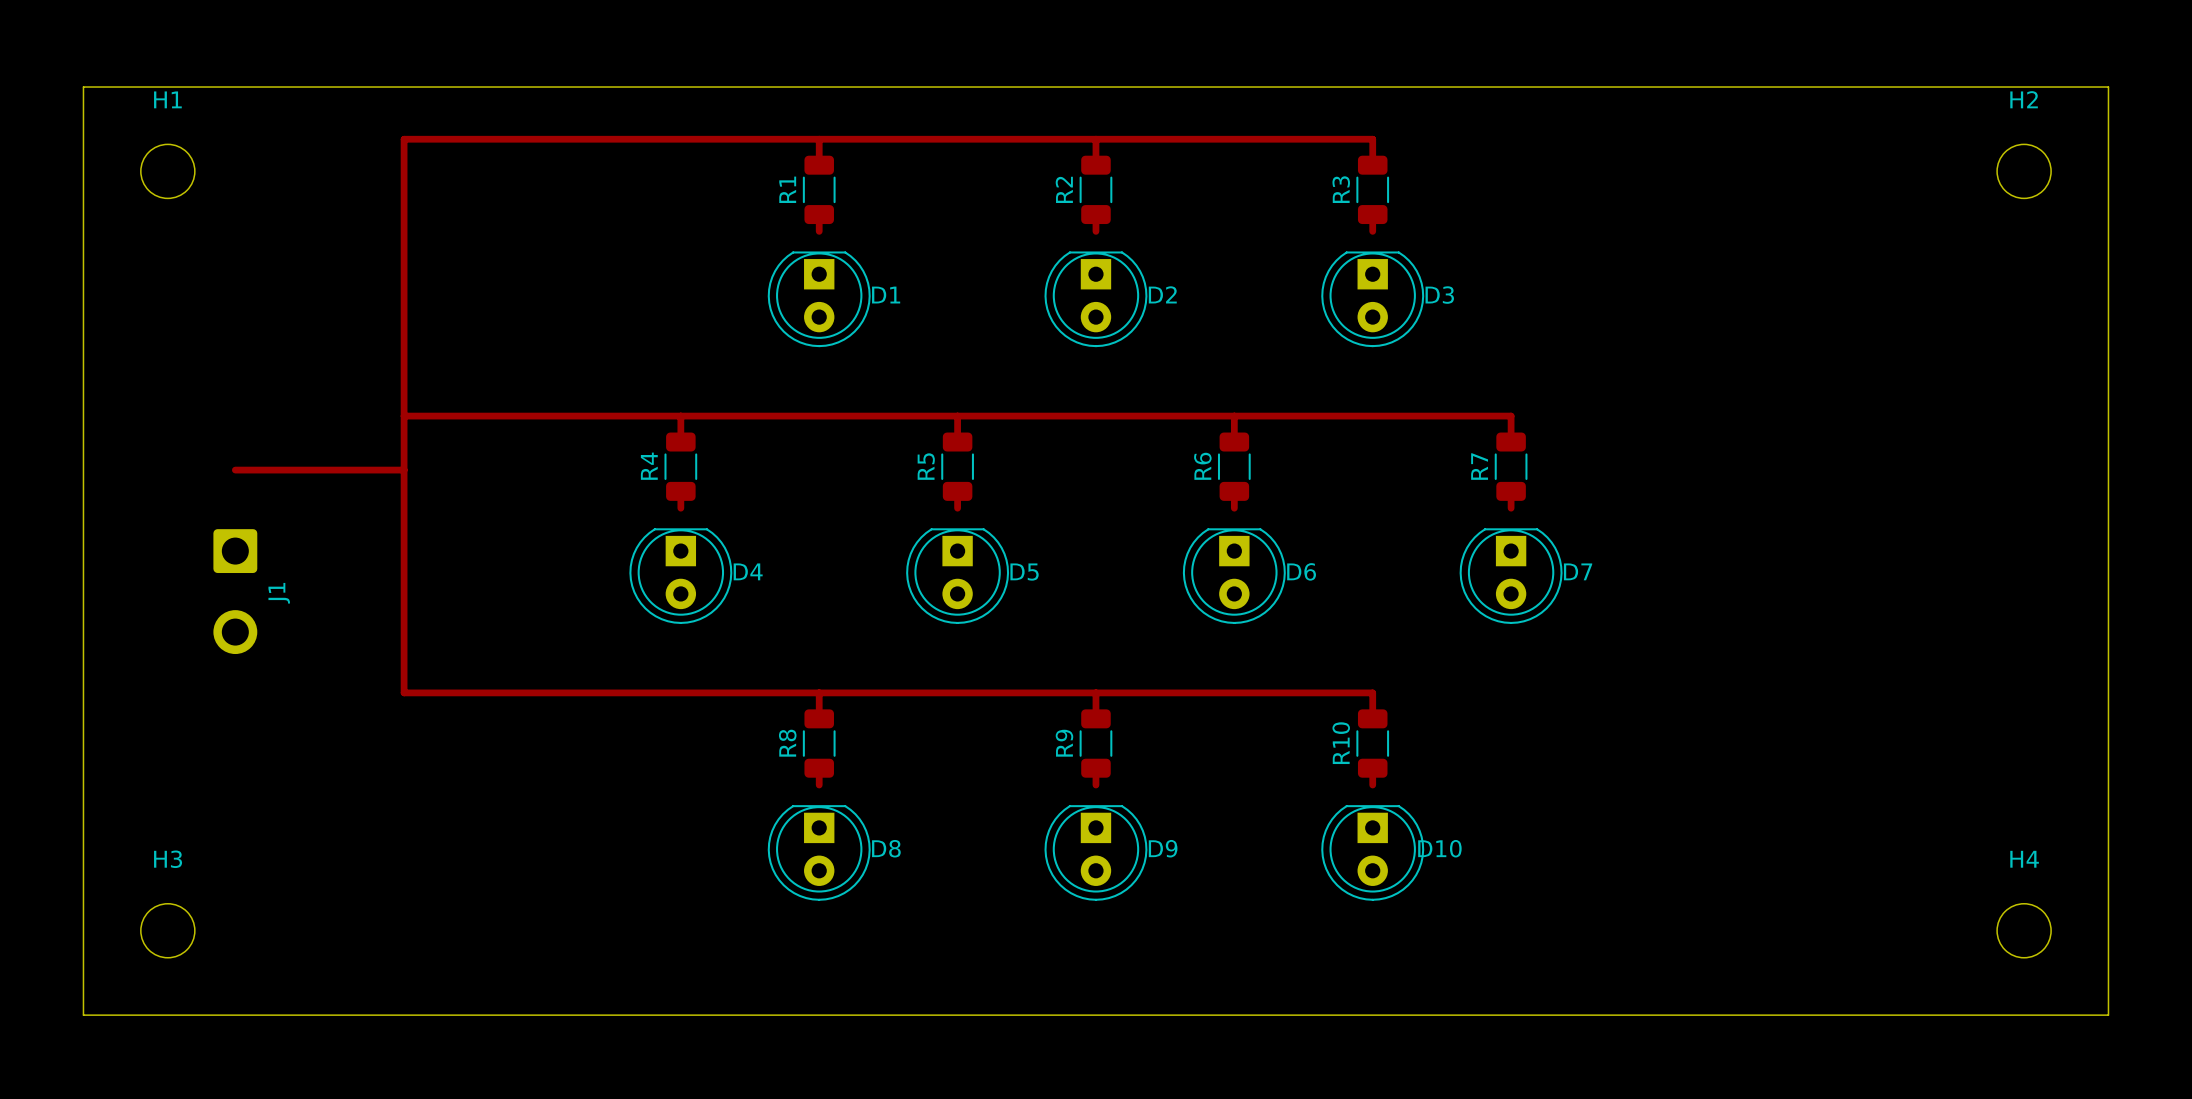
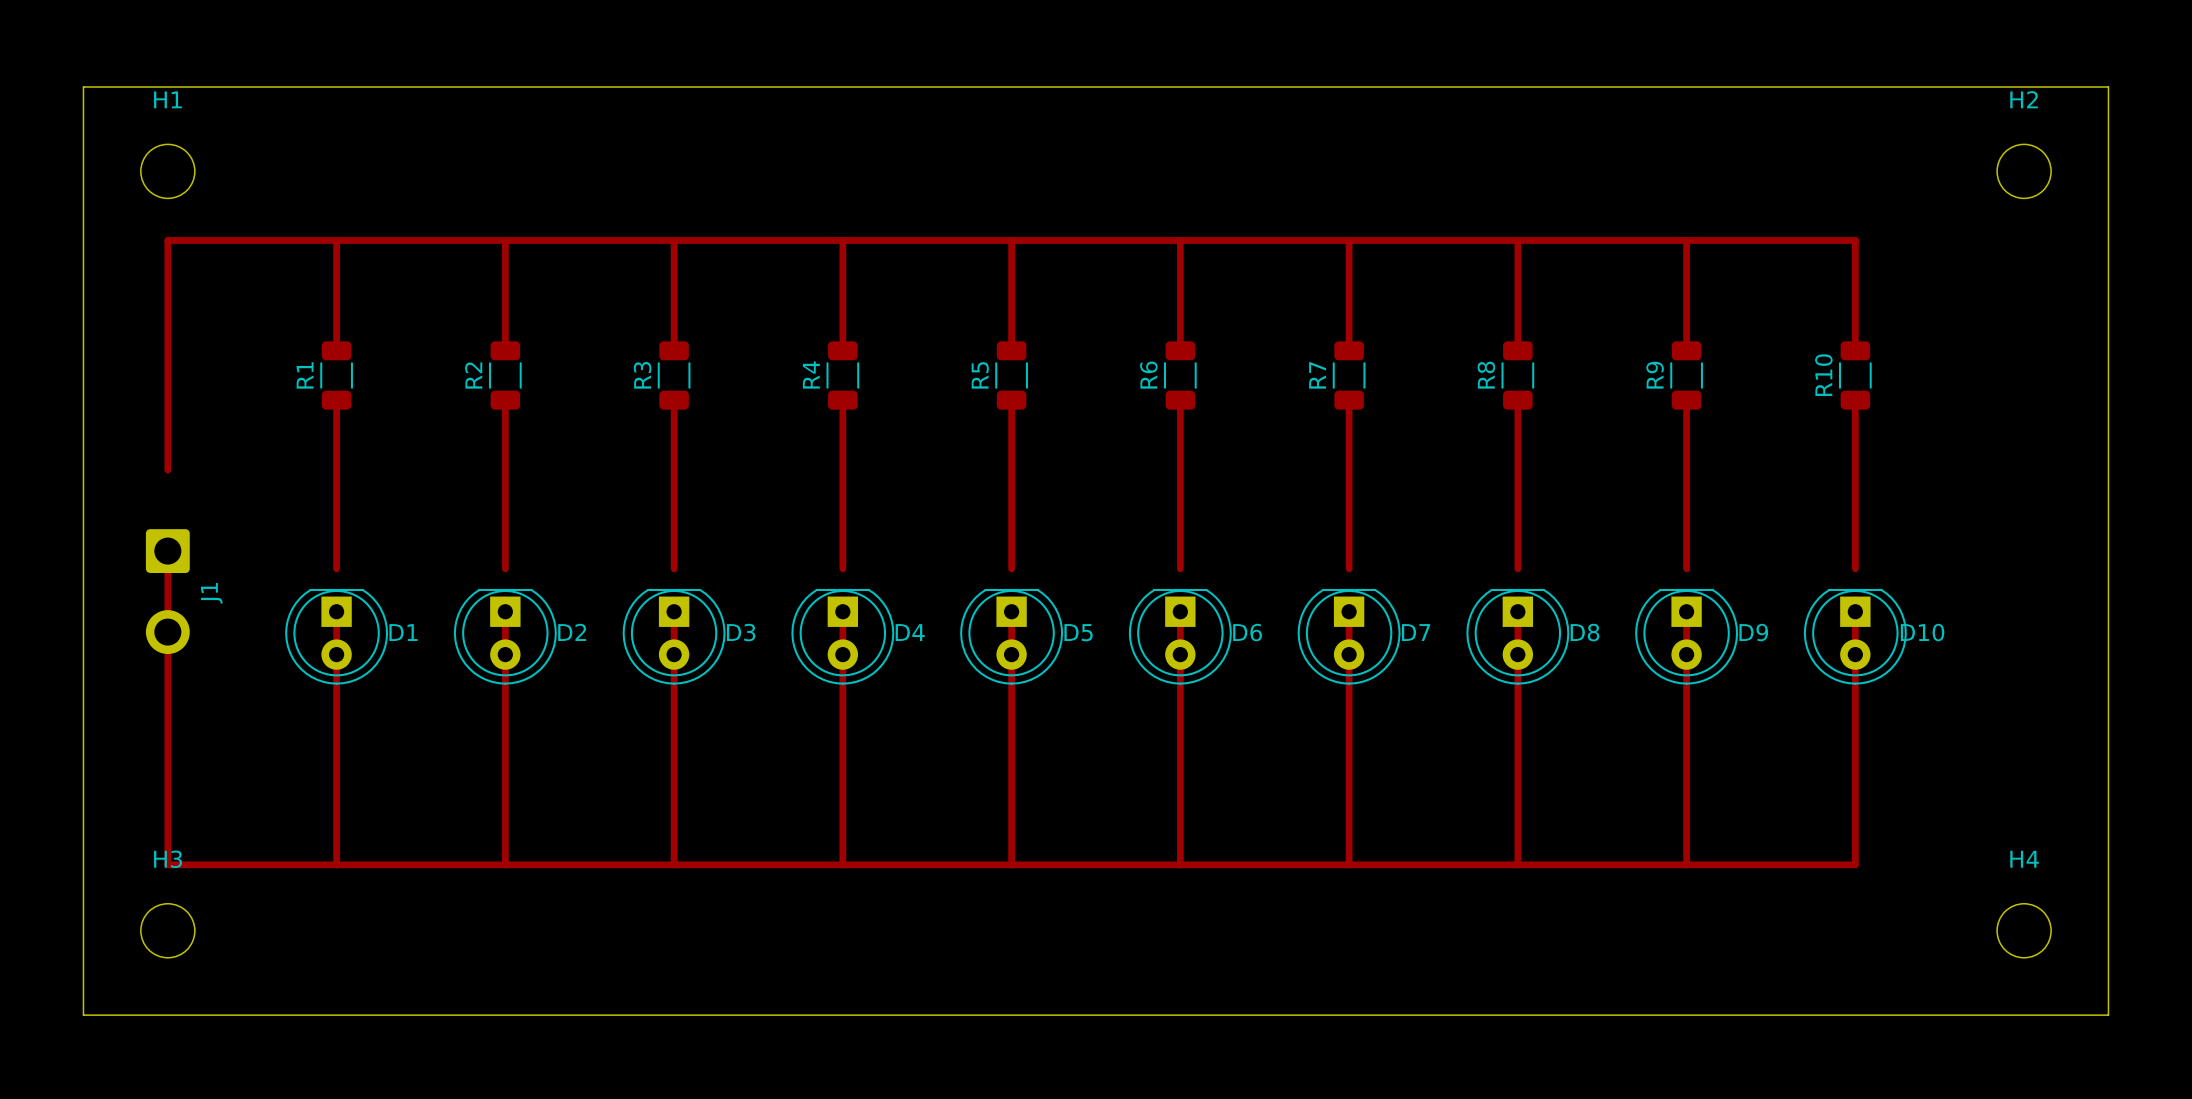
track: (819, 139) (819, 165) -> none
track: (1095, 139) (1095, 165) -> none
track: (1372, 165) (1372, 139) (404, 139) (404, 692) (1372, 692) (1372, 718) -> none
R1 position: (819, 189) -> (336, 375)
R2 position: (1095, 189) -> (505, 375)
R3 position: (1372, 189) -> (674, 375)
track: (819, 214) (819, 231) -> none
track: (1095, 214) (1095, 231) -> none
track: (1372, 214) (1372, 231) -> none
track: none -> (336, 240) (336, 350)
track: none -> (505, 240) (505, 350)
track: none -> (674, 240) (674, 350)
track: none -> (842, 240) (842, 350)
track: none -> (1011, 240) (1011, 350)
track: none -> (1180, 240) (1180, 350)
track: none -> (1349, 240) (1349, 350)
track: none -> (1517, 240) (1517, 350)
track: none -> (1686, 240) (1686, 350)
D1 position: (819, 299) -> (336, 636)
D2 position: (1095, 299) -> (505, 636)
D3 position: (1372, 299) -> (674, 636)
track: none -> (1855, 350) (1855, 240) (167, 240) (167, 470)
track: none -> (336, 400) (336, 568)
track: none -> (505, 400) (505, 568)
track: none -> (674, 400) (674, 568)
track: none -> (842, 400) (842, 568)
track: none -> (1011, 400) (1011, 568)
track: none -> (1180, 400) (1180, 568)
track: none -> (1349, 400) (1349, 568)
track: none -> (1517, 400) (1517, 568)
track: none -> (1686, 400) (1686, 568)
track: none -> (1855, 400) (1855, 568)
track: (404, 416) (1511, 416) (1511, 442) -> none
track: (680, 416) (680, 442) -> none
track: (957, 416) (957, 442) -> none
track: (1234, 416) (1234, 442) -> none
R4 position: (680, 466) -> (842, 375)
R5 position: (957, 466) -> (1011, 375)
R6 position: (1234, 466) -> (1180, 375)
R7 position: (1511, 466) -> (1349, 375)
track: (235, 470) (404, 470) -> none
track: (680, 491) (680, 508) -> none
track: (957, 491) (957, 508) -> none
track: (1234, 491) (1234, 508) -> none
track: (1511, 491) (1511, 508) -> none
track: none -> (167, 551) (167, 864) (1855, 864) (1855, 611)
D4 position: (680, 576) -> (842, 636)
D5 position: (957, 576) -> (1011, 636)
D6 position: (1234, 576) -> (1180, 636)
D7 position: (1511, 576) -> (1349, 636)
J1 position: (235, 591) -> (167, 591)
track: none -> (336, 611) (336, 864)
track: none -> (505, 611) (505, 864)
track: none -> (674, 611) (674, 864)
track: none -> (842, 611) (842, 864)
track: none -> (1011, 611) (1011, 864)
track: none -> (1180, 611) (1180, 864)
track: none -> (1349, 611) (1349, 864)
track: none -> (1517, 611) (1517, 864)
track: none -> (1686, 611) (1686, 864)
track: (819, 692) (819, 718) -> none
track: (1095, 692) (1095, 718) -> none
R8 position: (819, 743) -> (1517, 375)
R9 position: (1095, 743) -> (1686, 375)
R10 position: (1372, 743) -> (1855, 375)
track: (819, 768) (819, 785) -> none
track: (1095, 768) (1095, 785) -> none
track: (1372, 768) (1372, 785) -> none
D8 position: (819, 852) -> (1517, 636)
D9 position: (1095, 852) -> (1686, 636)
D10 position: (1372, 852) -> (1855, 636)

